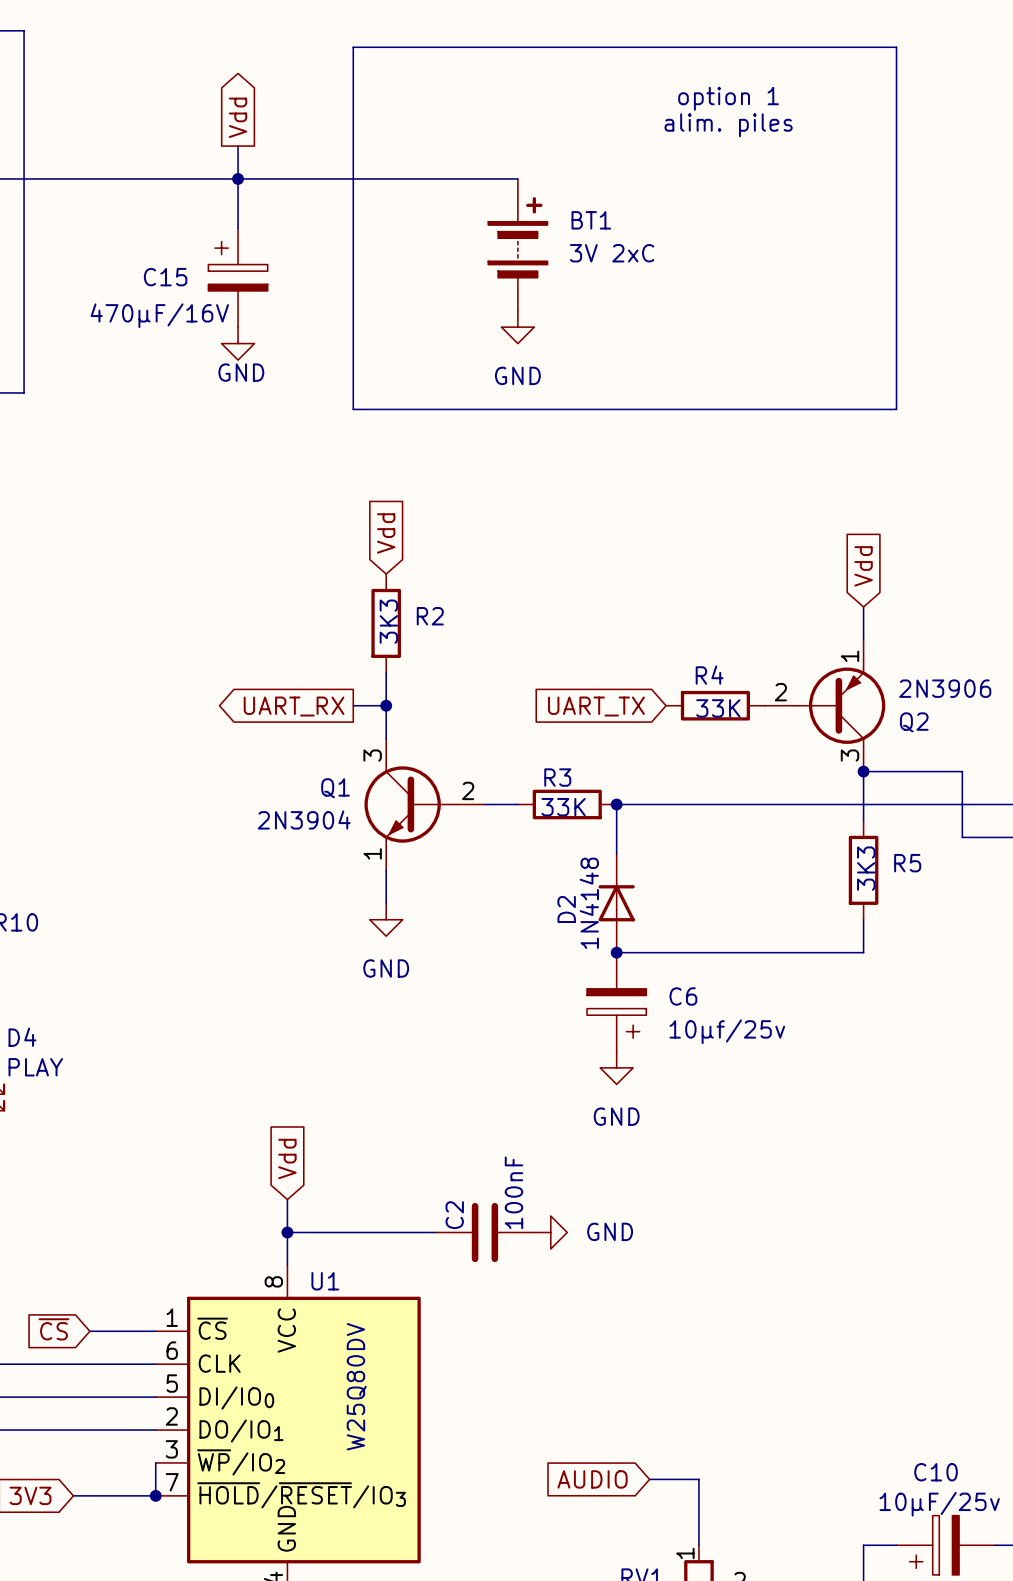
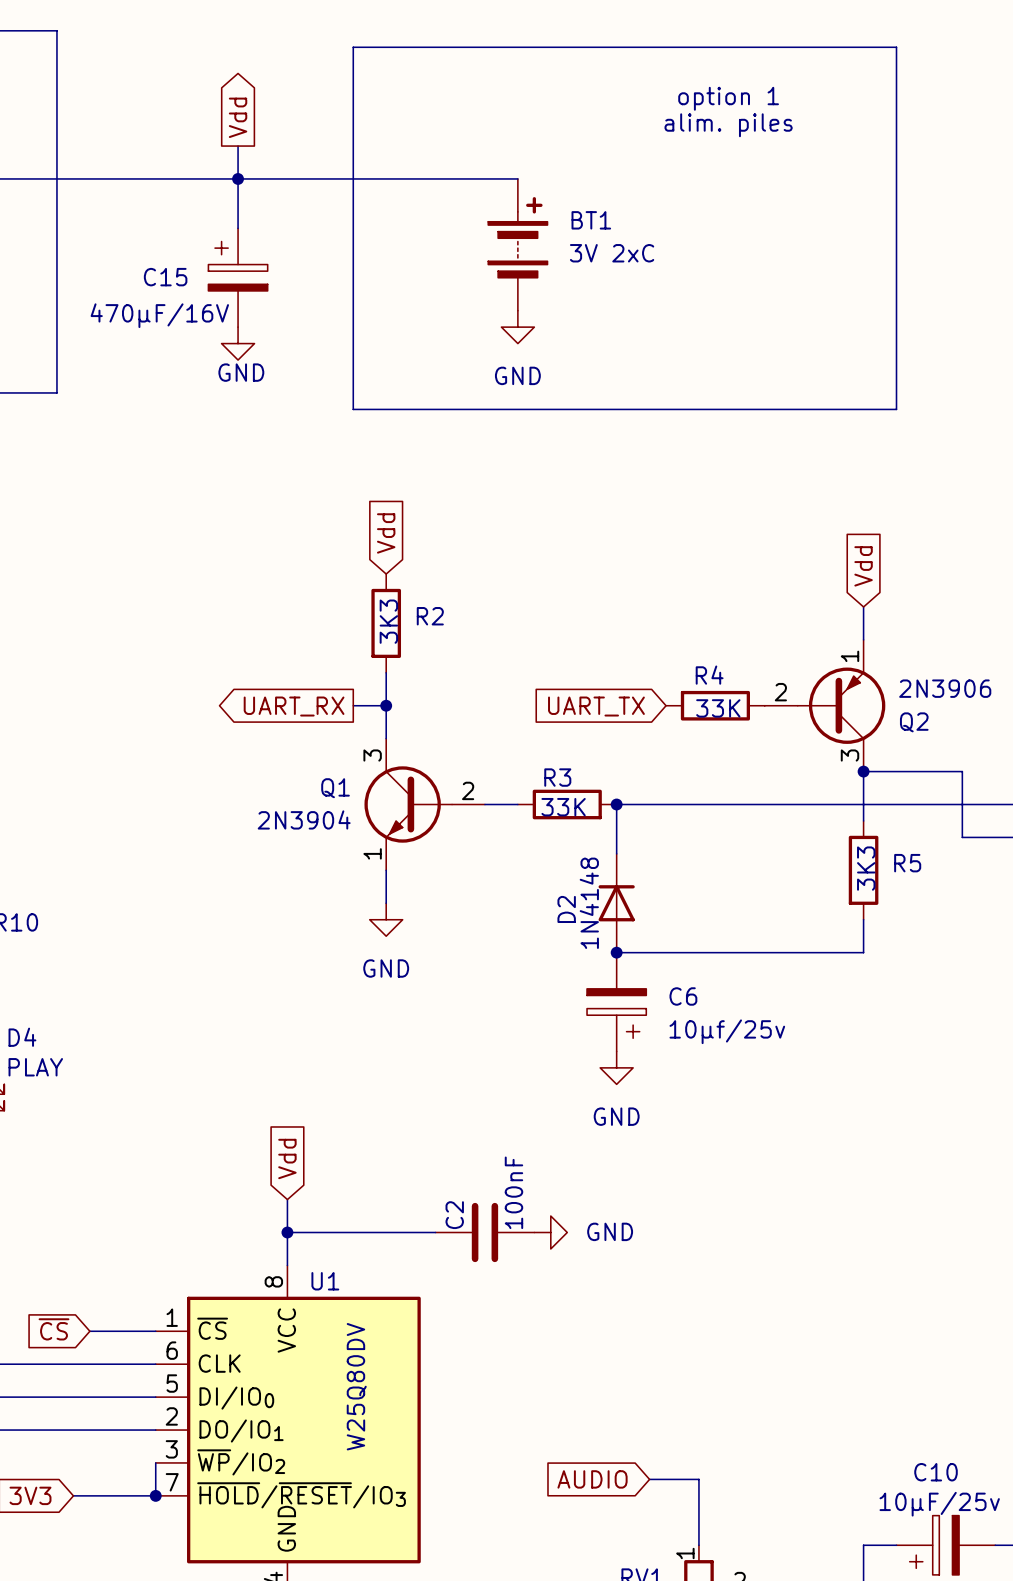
line: (24, 30) (24, 392) -> (24, 30) (56, 30) (56, 392) (24, 392)

